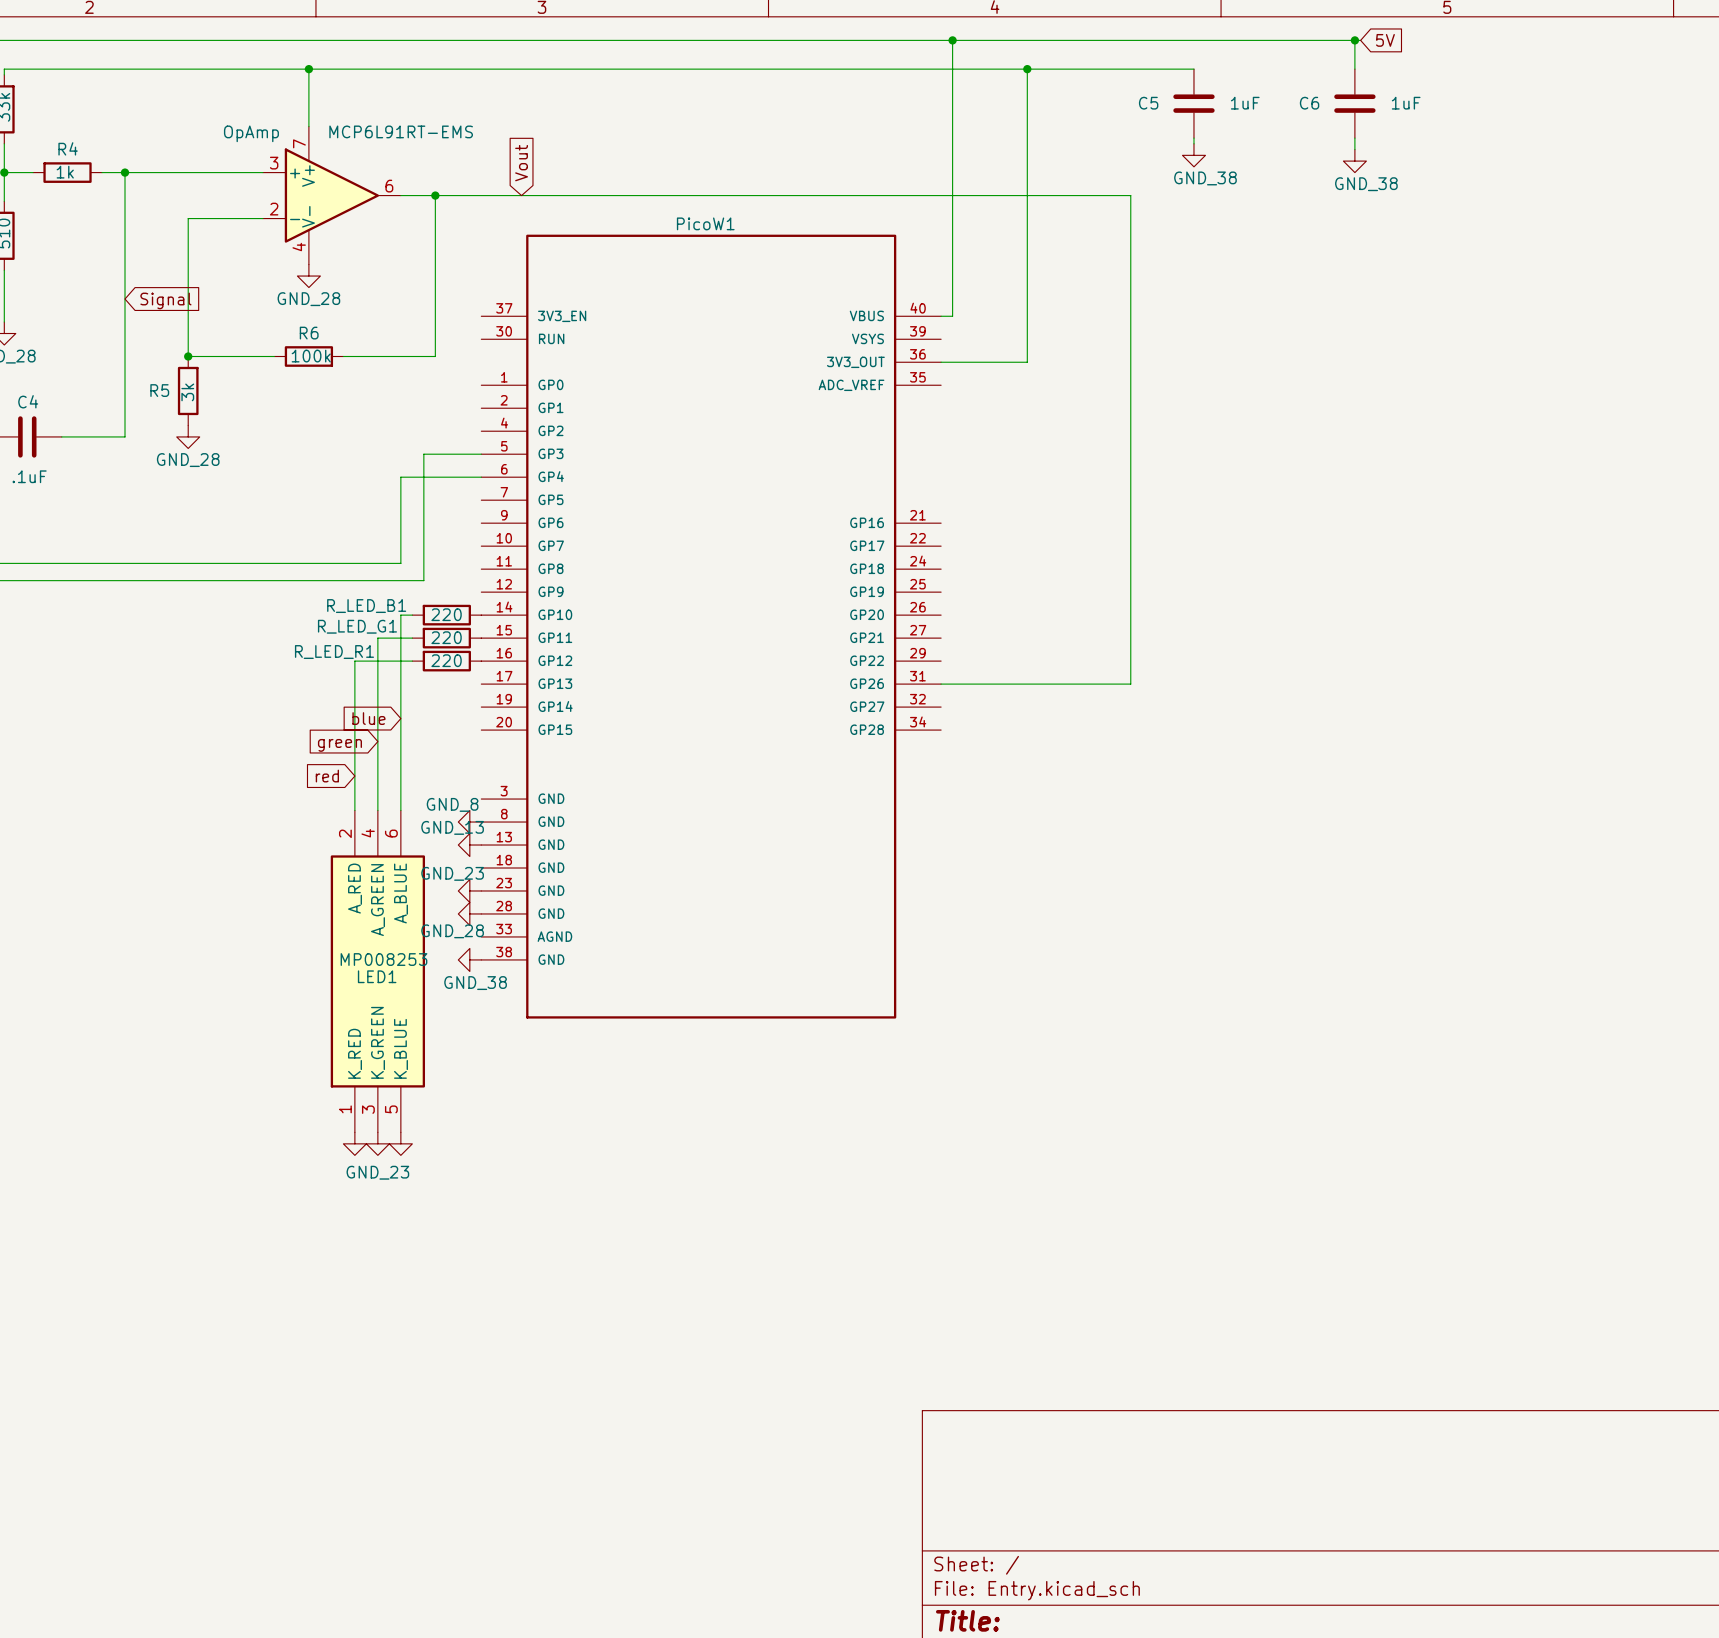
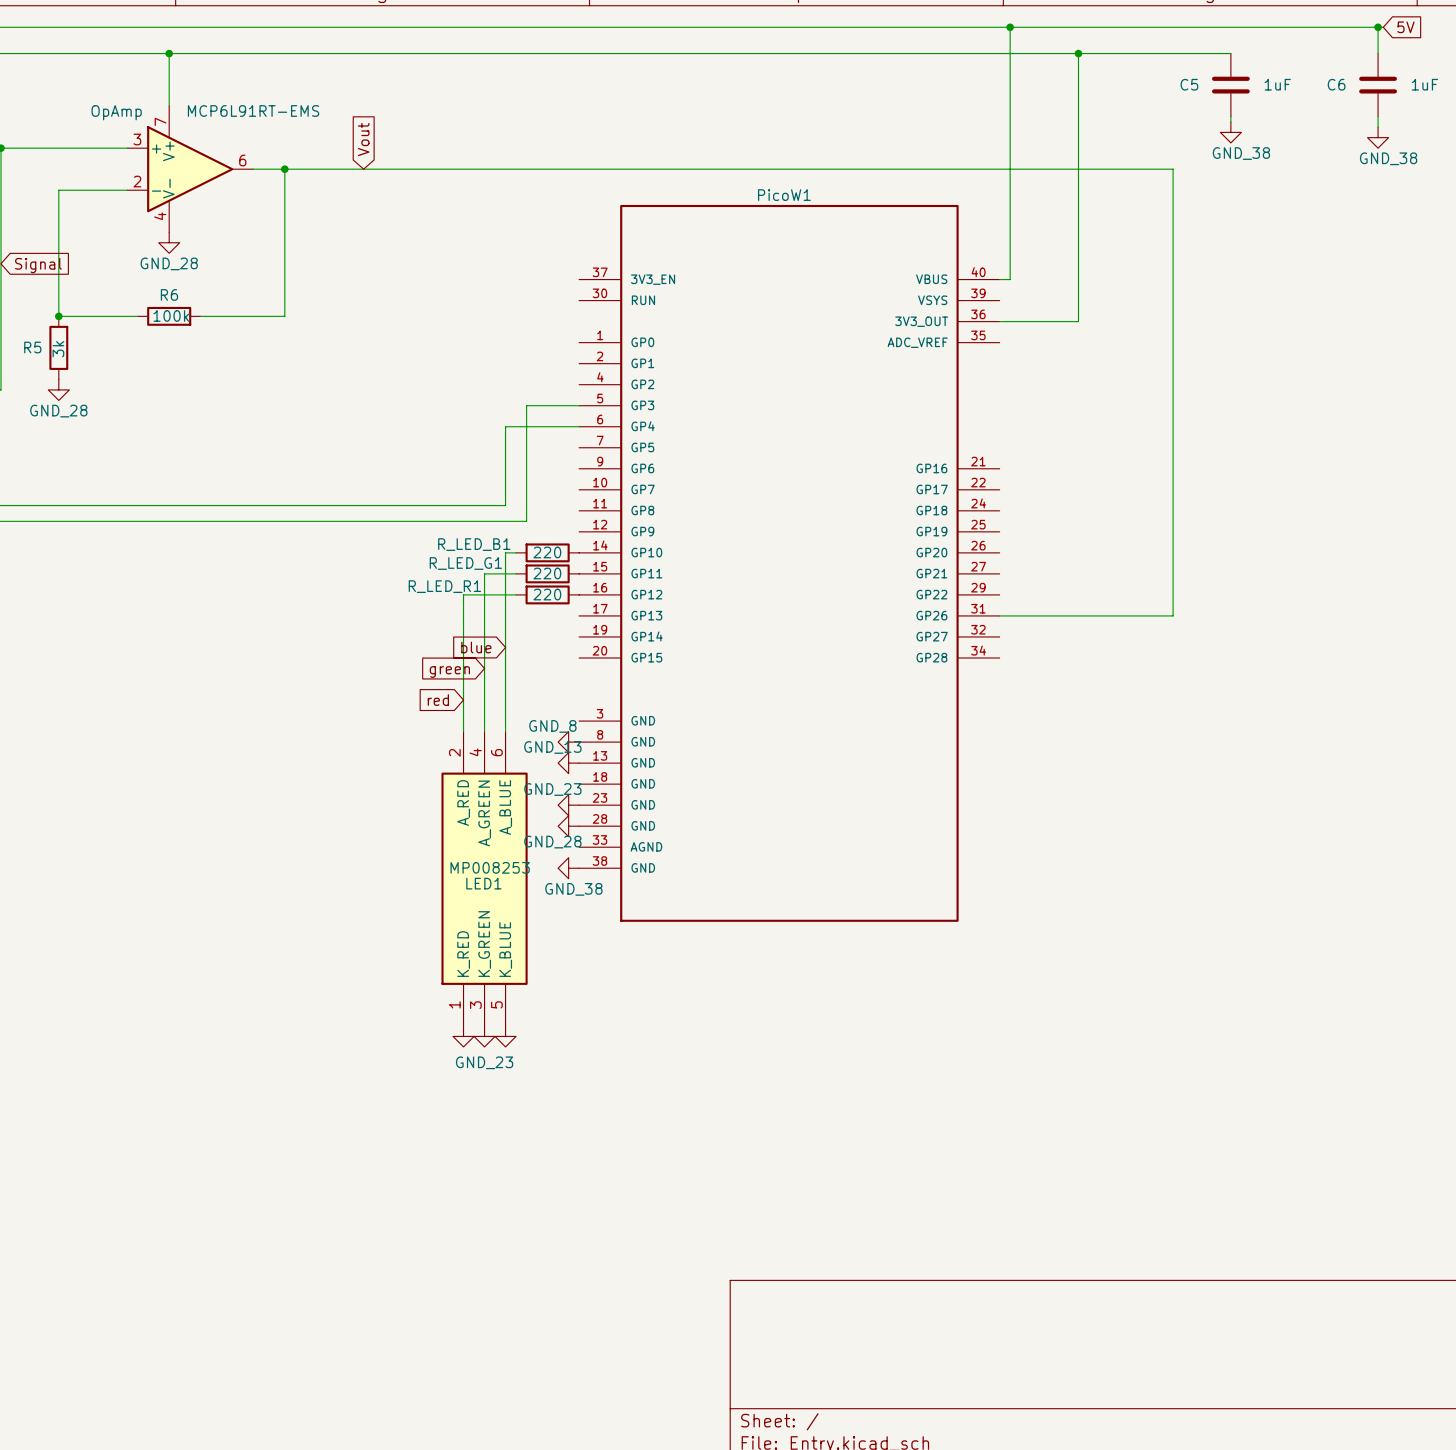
wire: (952, 40) (952, 316) (941, 316) -> none
junction: (952, 40) -> none
wire: none -> (1010, 27) (1010, 279) (999, 279)
junction: none -> (1010, 27)
wire: (1354, 40) (1354, 69) -> none
junction: (1354, 40) -> none
wire: none -> (1131, 27) (1383, 27)
global label: 5V (1385, 40) -> none
wire: none -> (1378, 27) (1378, 53)
junction: none -> (1378, 27)
global label: none -> 5V (1405, 27)
wire: (1027, 69) (1027, 362) (941, 362) -> none
junction: (1027, 69) -> none
wire: none -> (978, 53) (1230, 53)
wire: none -> (1078, 53) (1078, 321) (999, 321)
junction: none -> (1078, 53)
C5 position: (1193, 103) -> (1230, 85)
C6 position: (1354, 103) -> (1378, 85)
wire: (1193, 138) (1193, 143) -> none
wire: (1354, 138) (1354, 149) -> none
wire: none -> (1230, 116) (1230, 121)
wire: none -> (1378, 116) (1378, 127)
power symbol: GND_38 (1193, 155) -> none
power symbol position: GND_38 (1354, 161) -> GND_38 (1230, 132)
power symbol: none -> GND_38 (1378, 137)
wire: (1130, 195) (1130, 684) (941, 684) -> (920, 169) (1173, 169) (1173, 615) (999, 615)
wire: (481, 454) (423, 454) (423, 580) -> (579, 405) (526, 405) (526, 521) (274, 521)
wire: (481, 477) (400, 477) (400, 563) -> (579, 426) (505, 426) (505, 505) (253, 505)
wire: (412, 615) (400, 615) (400, 810) -> none
R_LED_B1 position: (446, 615) -> (547, 552)
wire: none -> (516, 552) (505, 552) (505, 731)
PicoW1 position: (711, 626) -> (789, 563)
wire: (412, 638) (377, 638) (377, 810) -> none
R_LED_G1 position: (446, 638) -> (547, 573)
wire: none -> (516, 573) (484, 573) (484, 731)
wire: (412, 661) (354, 661) (354, 810) -> none
R_LED_R1 position: (446, 661) -> (547, 594)
wire: none -> (516, 594) (463, 594) (463, 731)
global label: blue (368, 718) -> none
global label: none -> blue (476, 647)
global label: green (339, 745) -> none
global label: none -> green (449, 672)
global label: red (327, 776) -> none
global label: none -> red (438, 700)
power symbol: GND_8 (469, 822) -> none
power symbol: none -> GND_8 (568, 742)
power symbol: GND_13 (469, 845) -> none
power symbol: none -> GND_13 (568, 763)
power symbol: GND_23 (469, 890) -> none
power symbol: none -> GND_23 (568, 805)
power symbol: GND_28 (469, 913) -> none
power symbol: none -> GND_28 (568, 826)
power symbol: GND_38 (469, 959) -> none
power symbol: none -> GND_38 (568, 868)
LED1 position: (377, 971) -> (484, 878)
power symbol: (354, 1143) -> none
power symbol: (377, 1143) -> none
power symbol: GND_23 (400, 1143) -> none
power symbol: none -> (463, 1036)
power symbol: none -> (484, 1036)
power symbol: none -> GND_23 (505, 1036)

